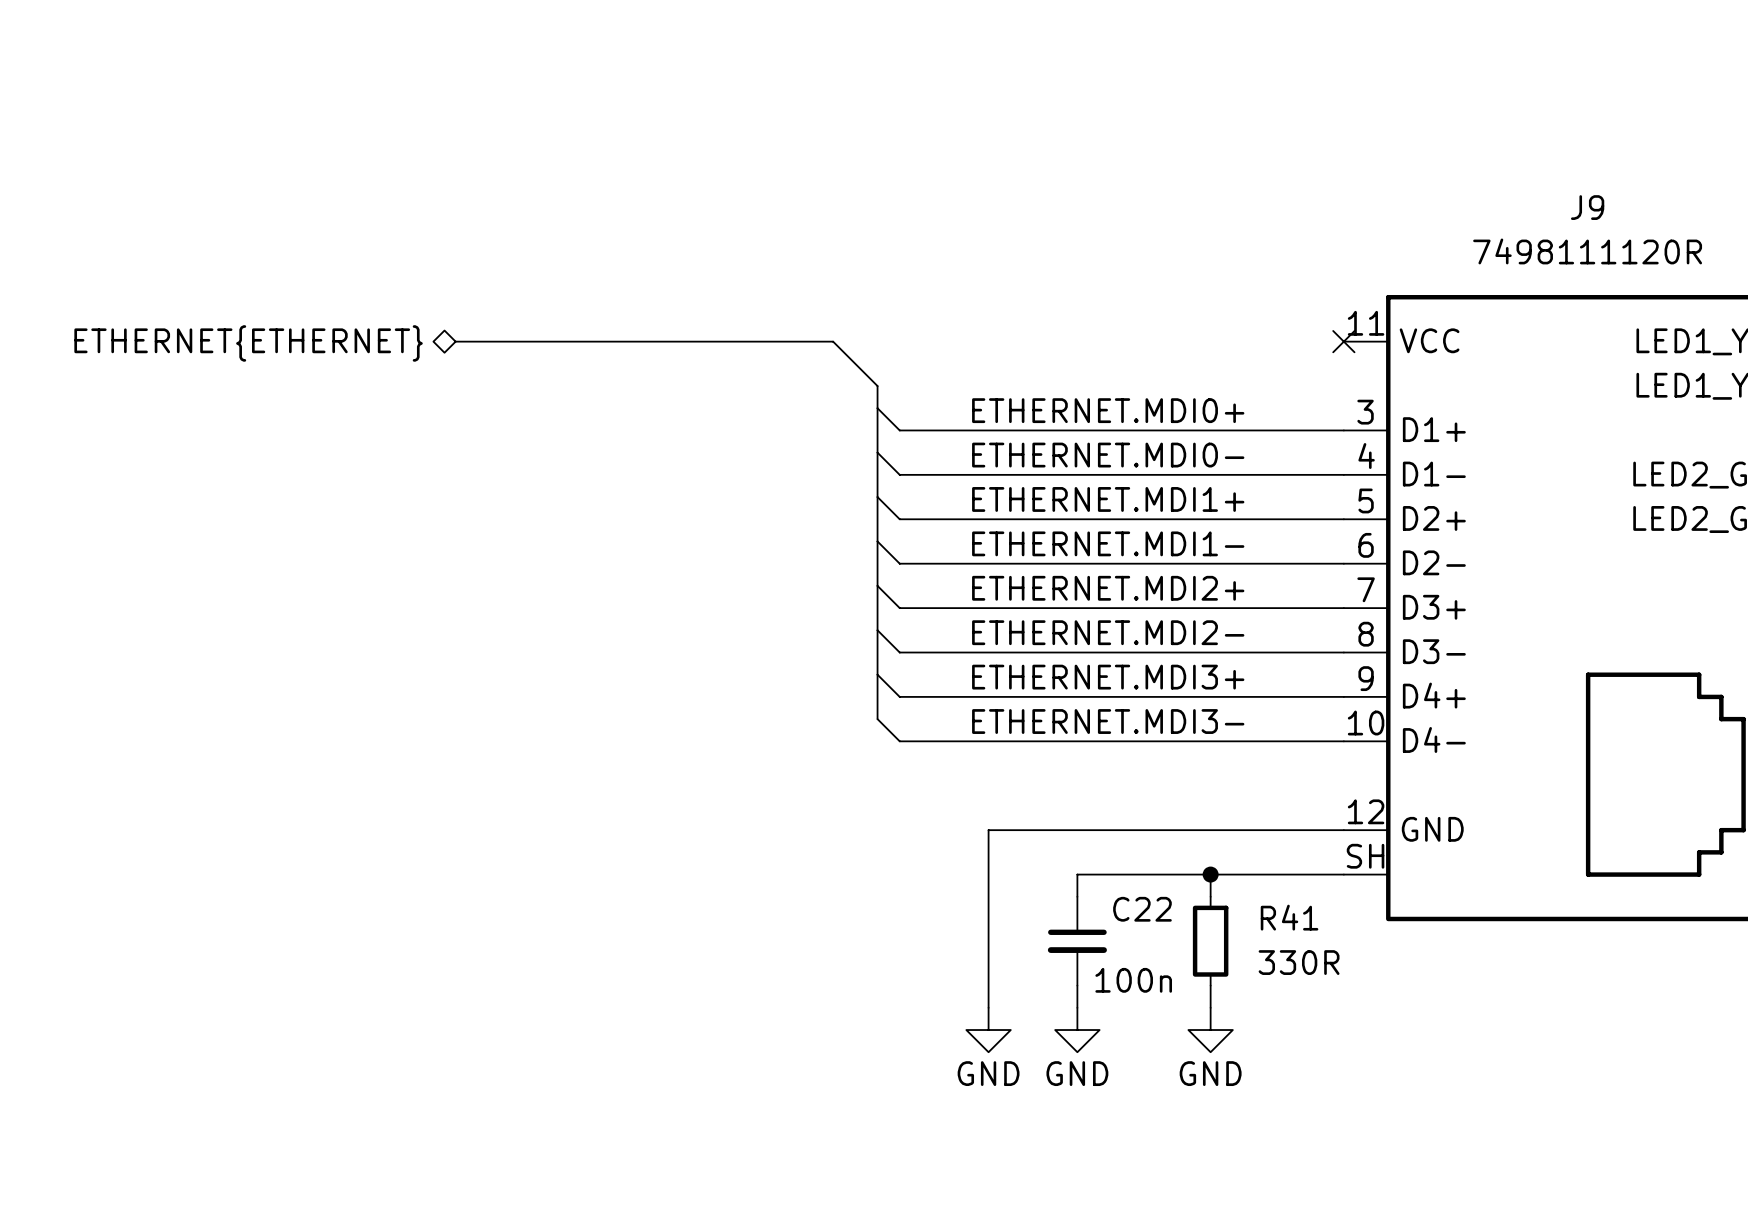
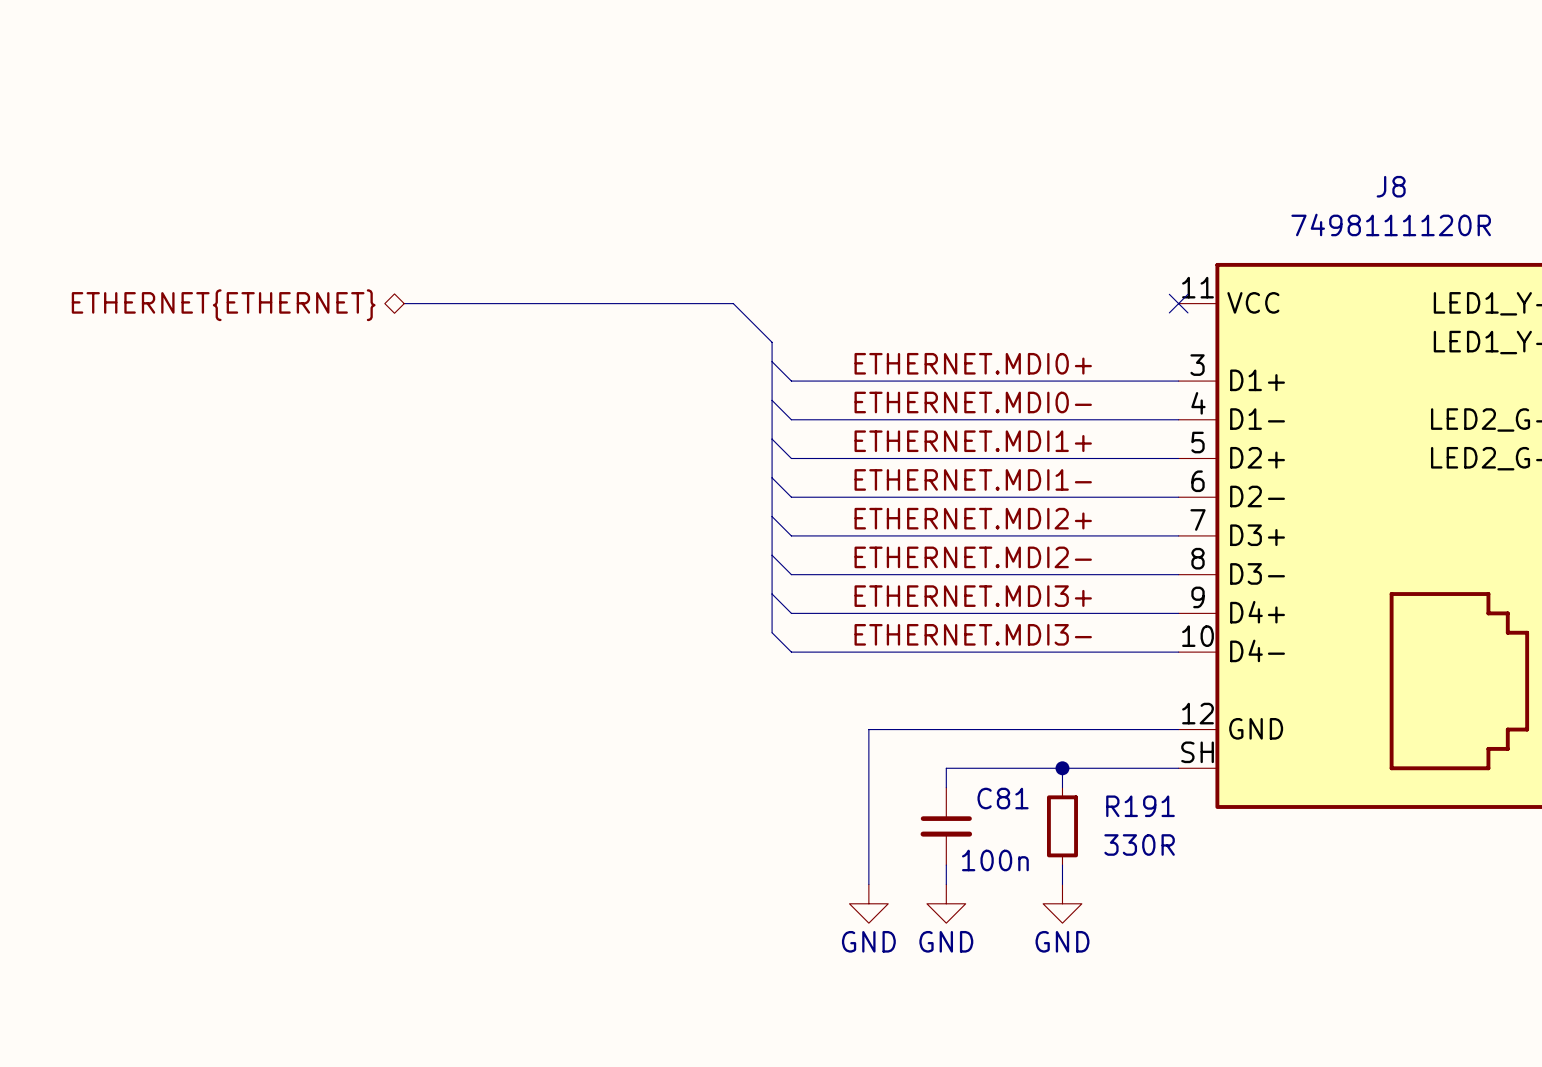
J9 name: J9 (1587, 207) -> J8 (1391, 186)
C22 name: C22 (1142, 909) -> C81 (1003, 798)
R41 name: R41 (1289, 917) -> R191 (1140, 806)

